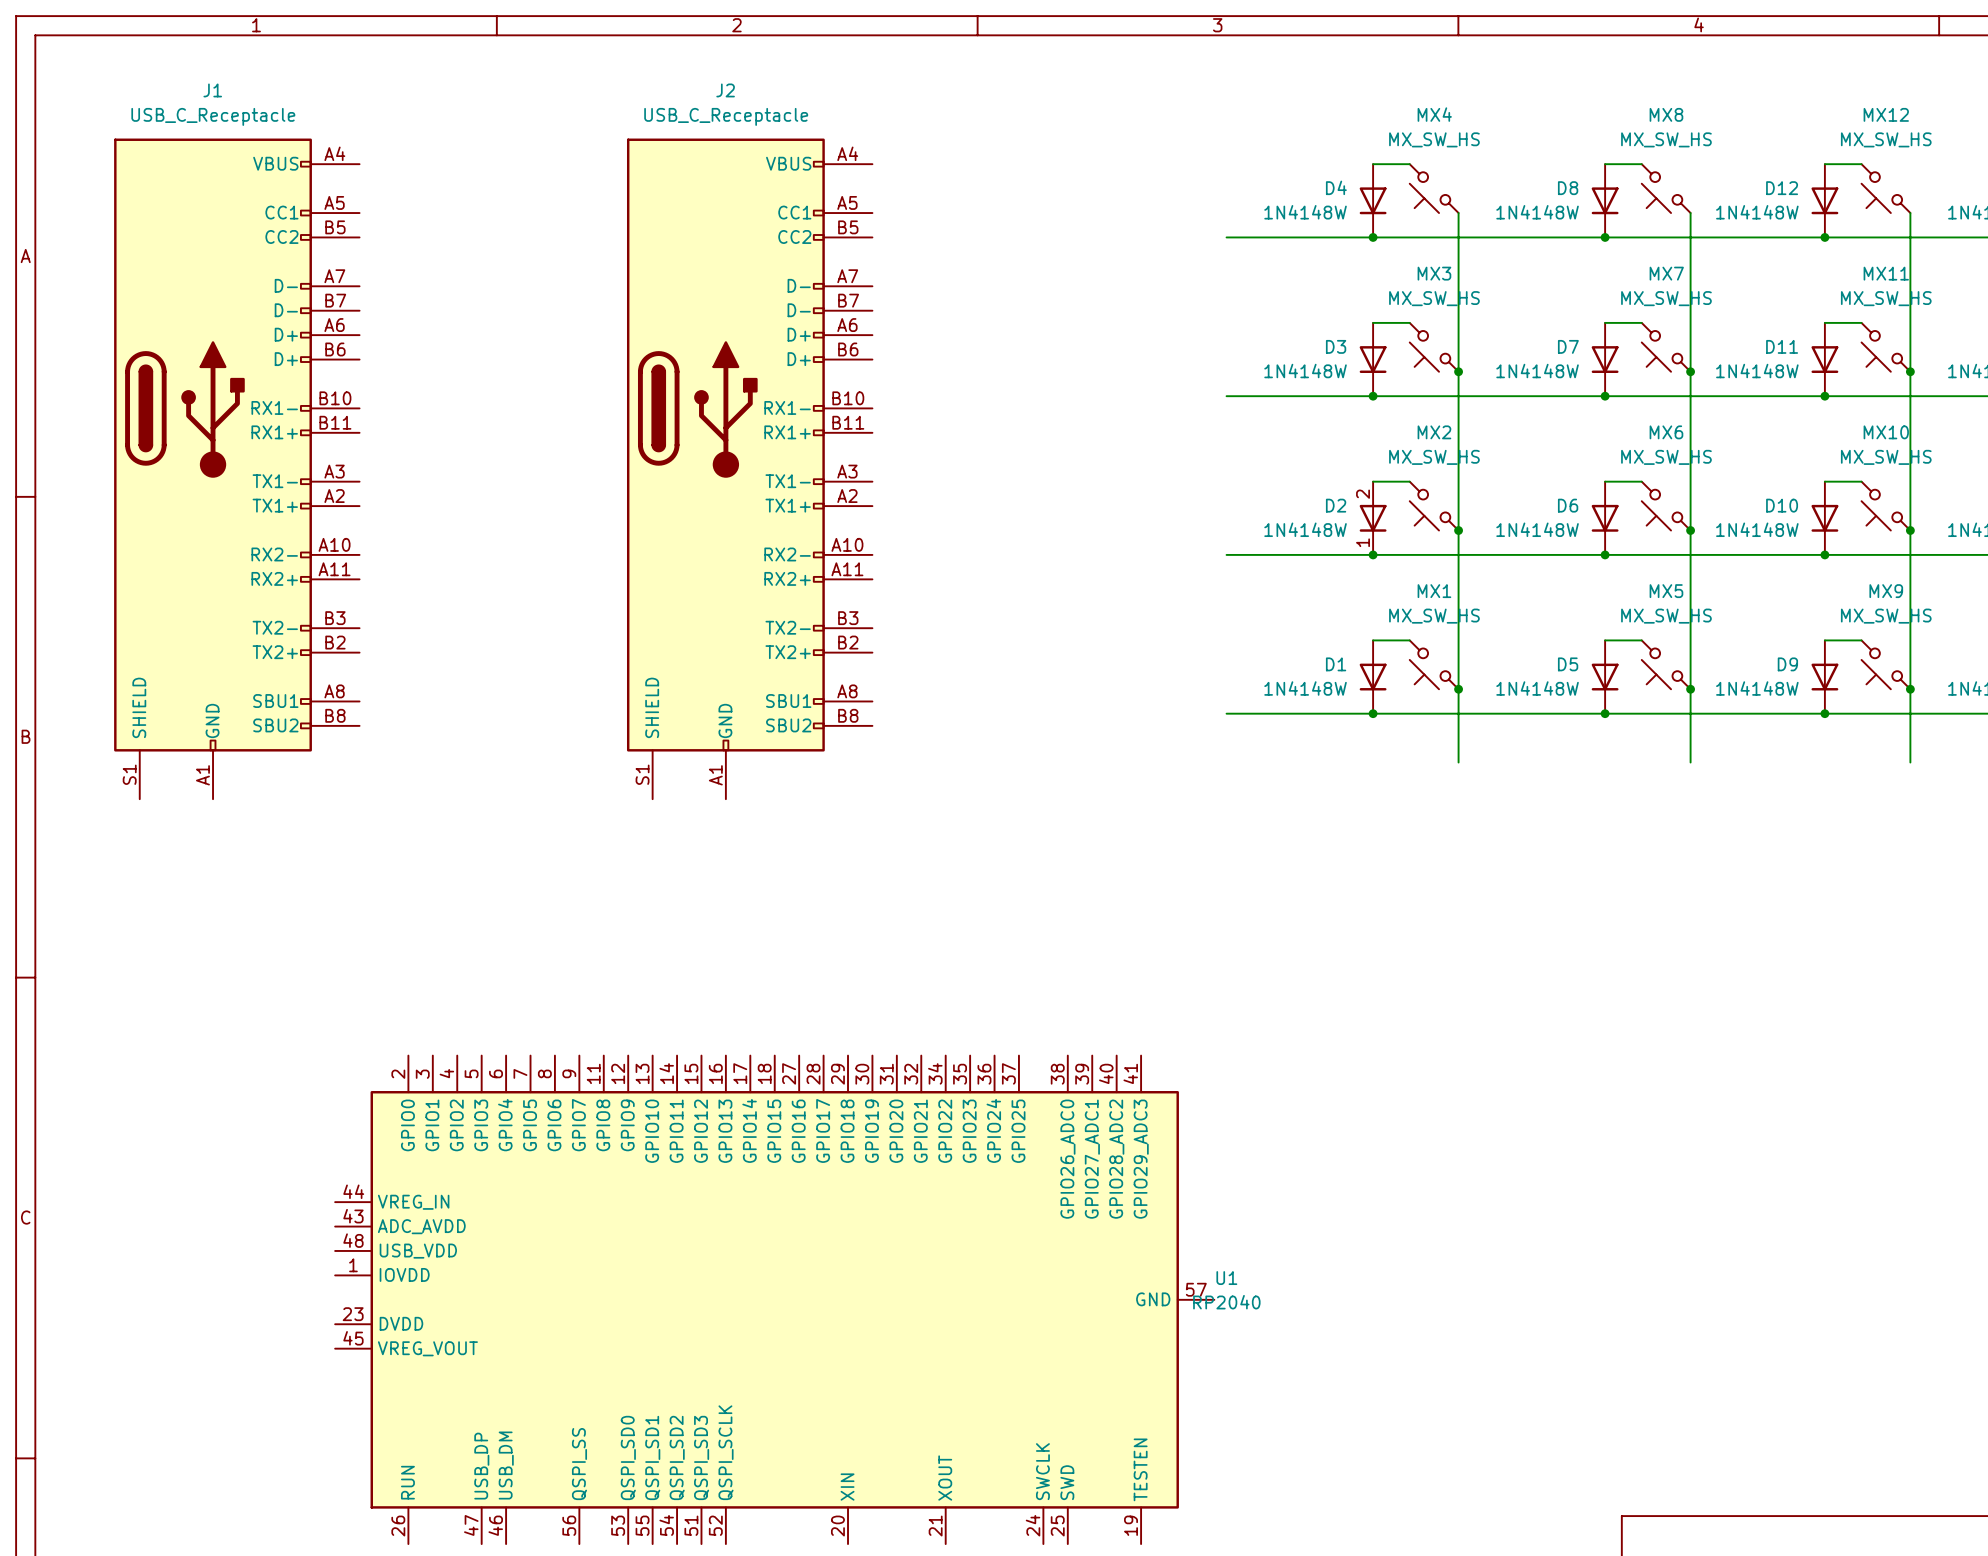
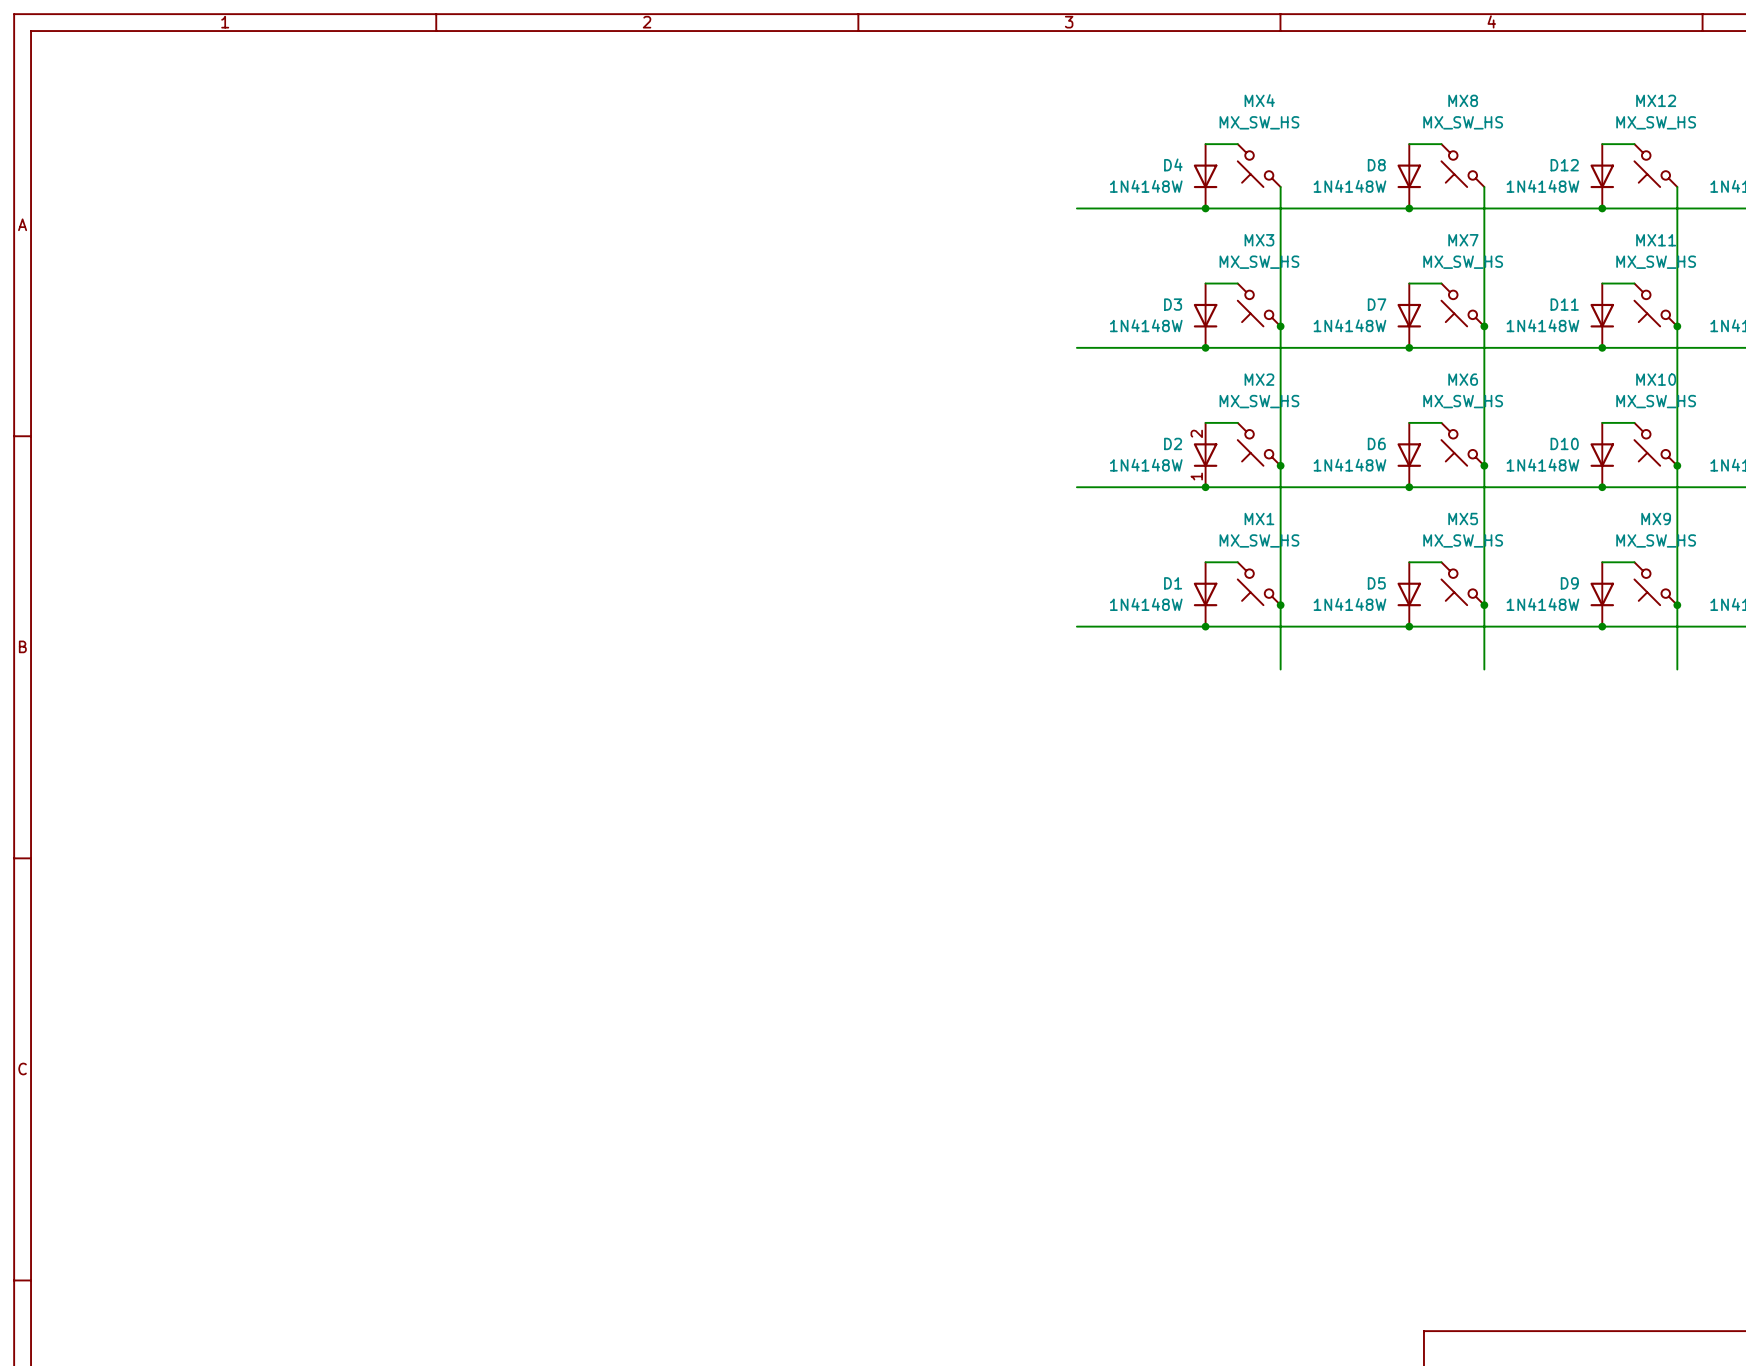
J1: USB_C_Receptacle (236, 468) -> none
J2: USB_C_Receptacle (749, 468) -> none
U1: RP2040 (774, 1299) -> none

